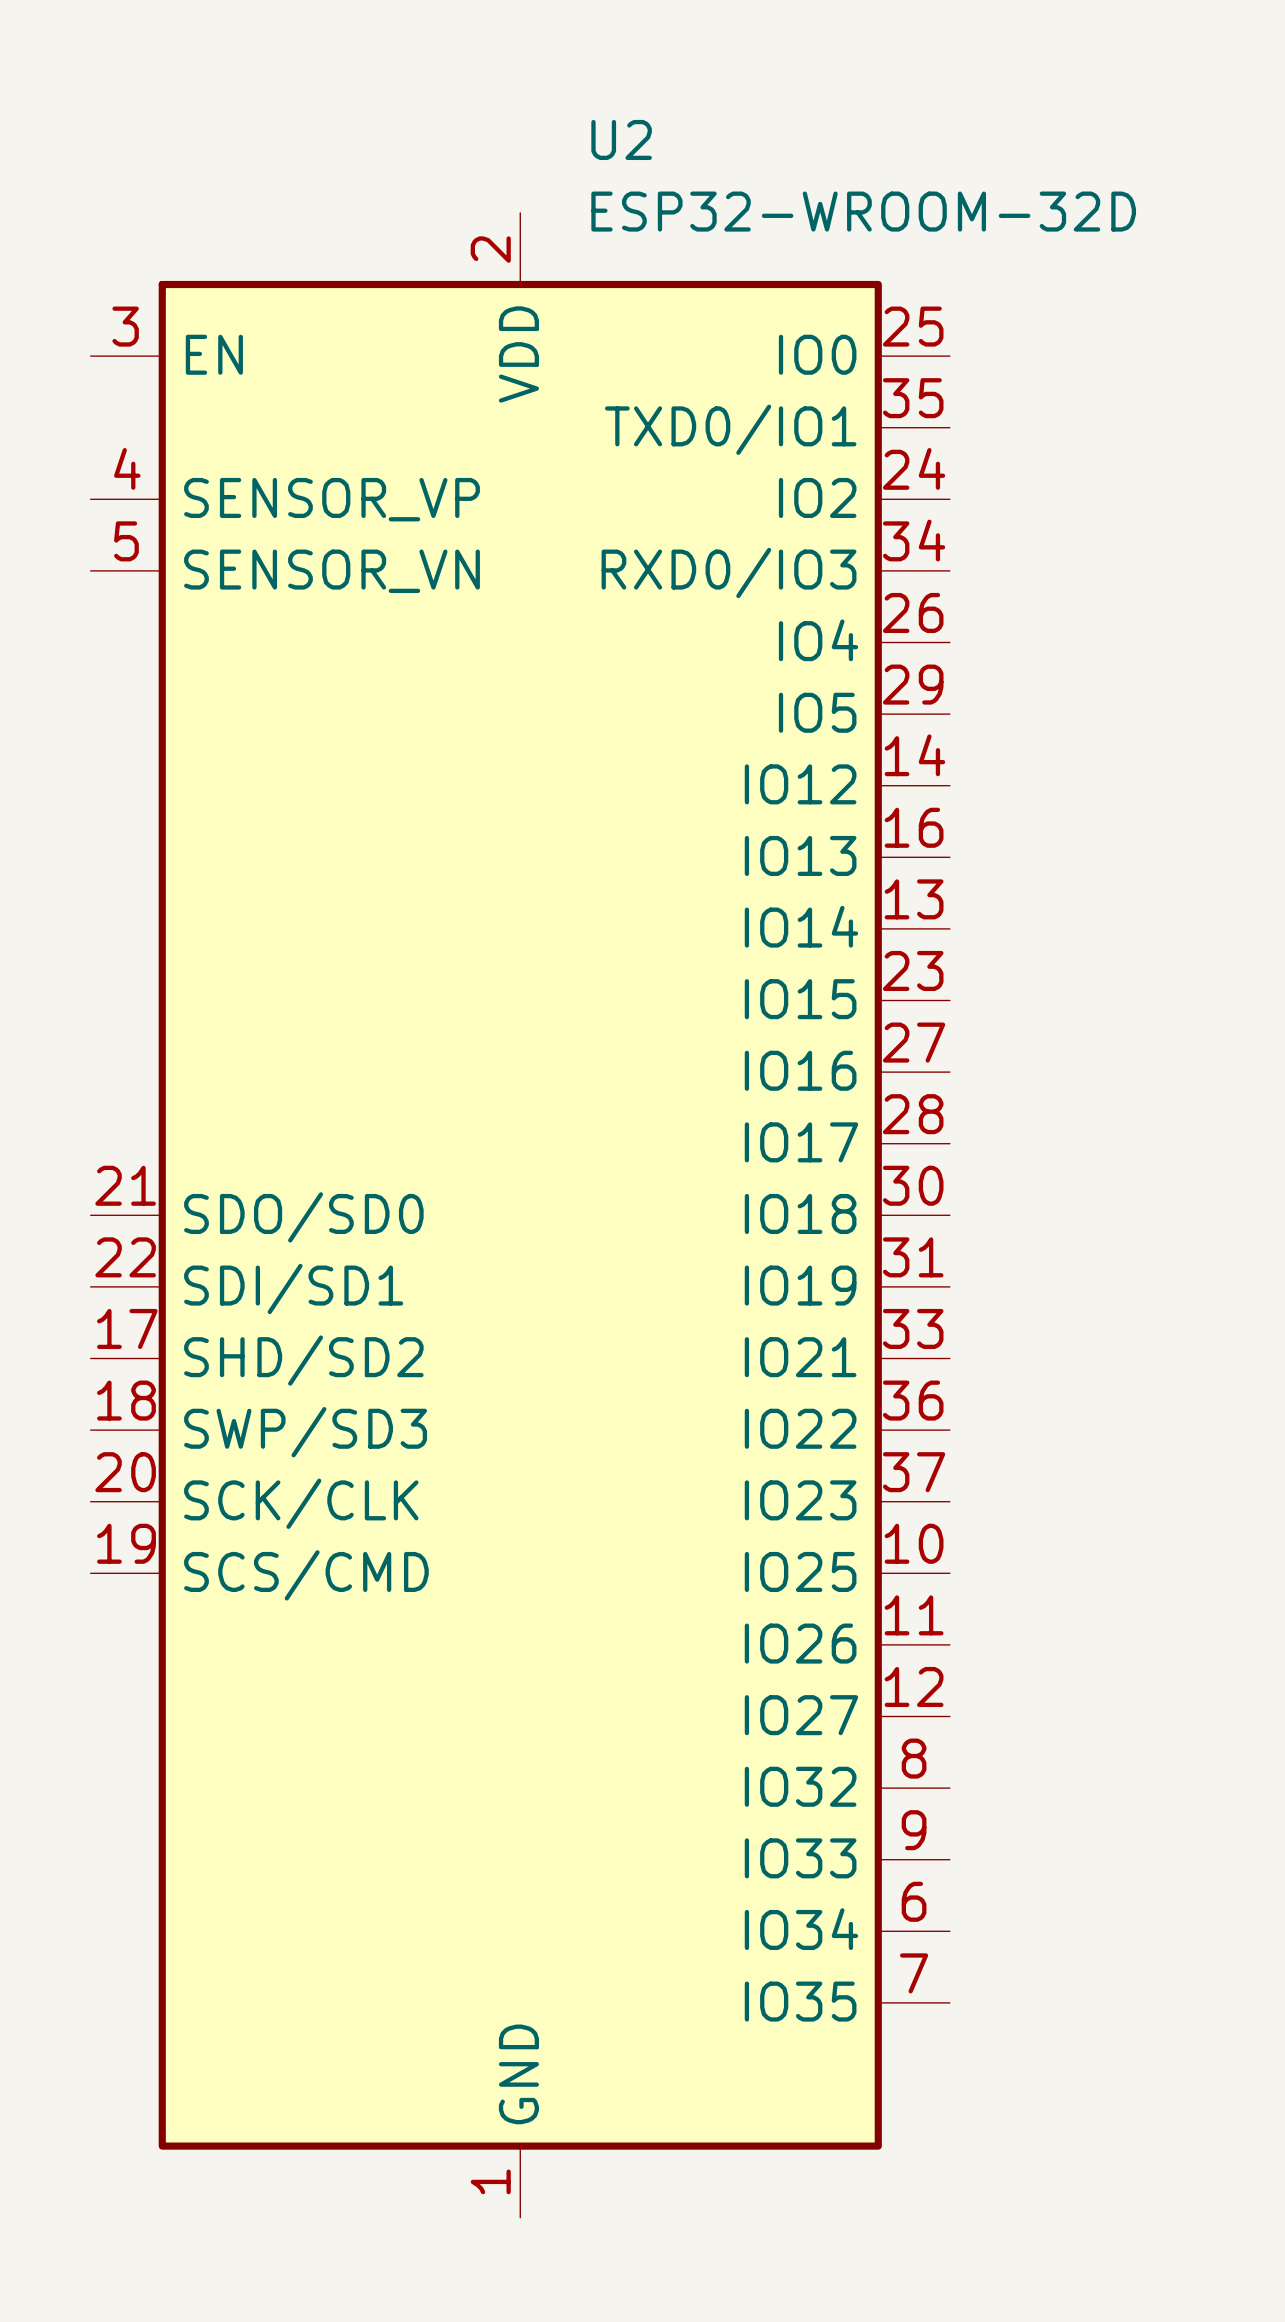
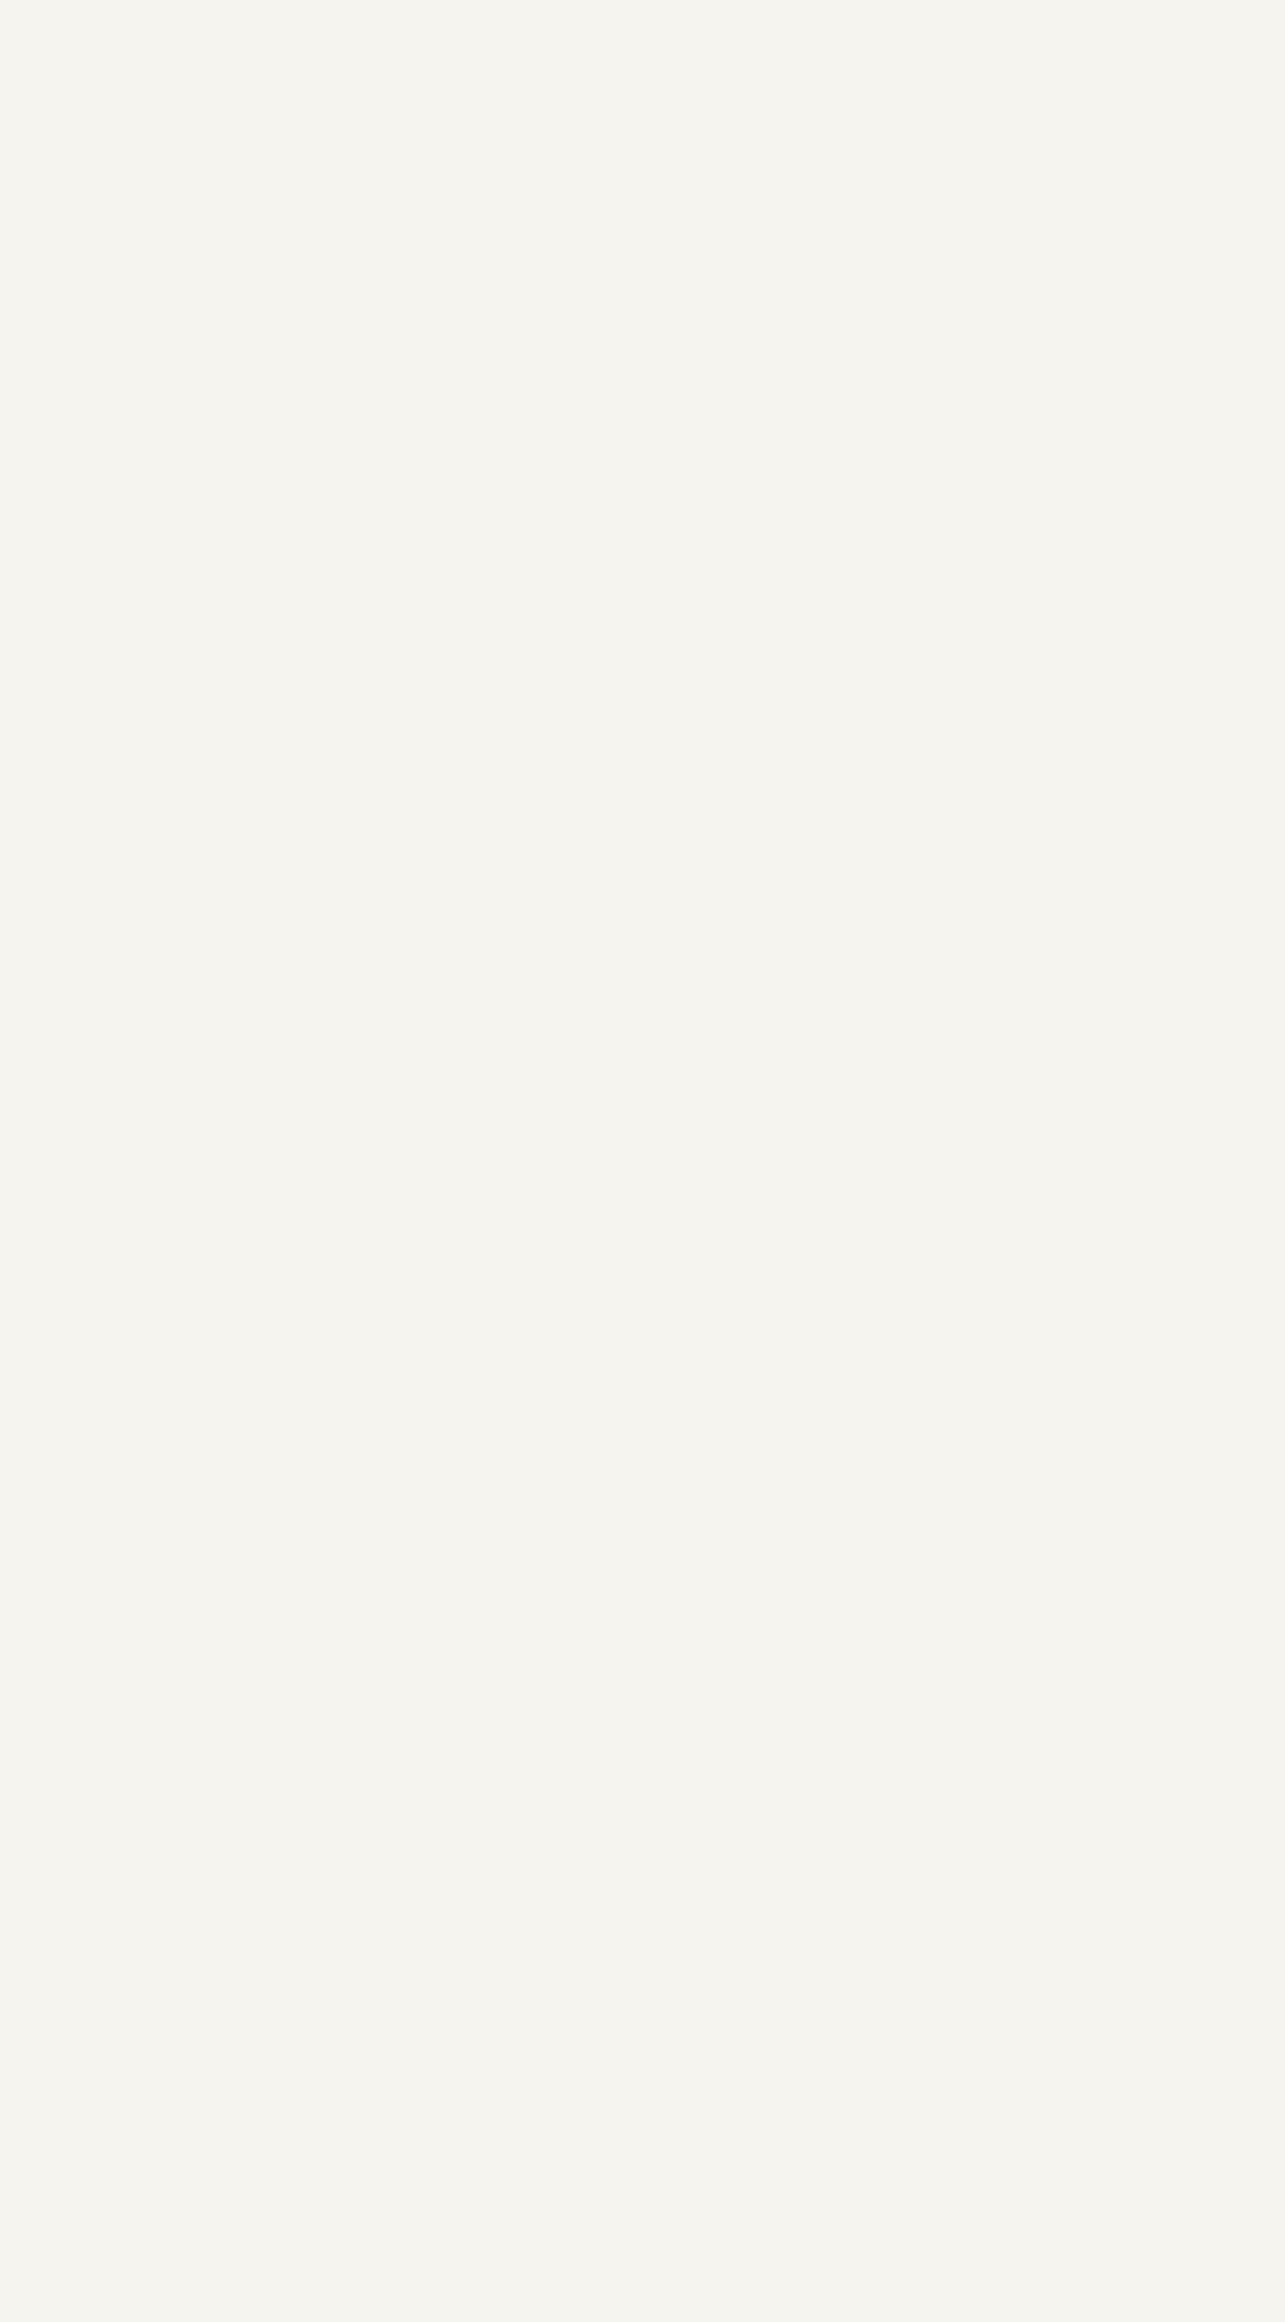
U2: ESP32-WROOM-32D (520, 1215) -> none

